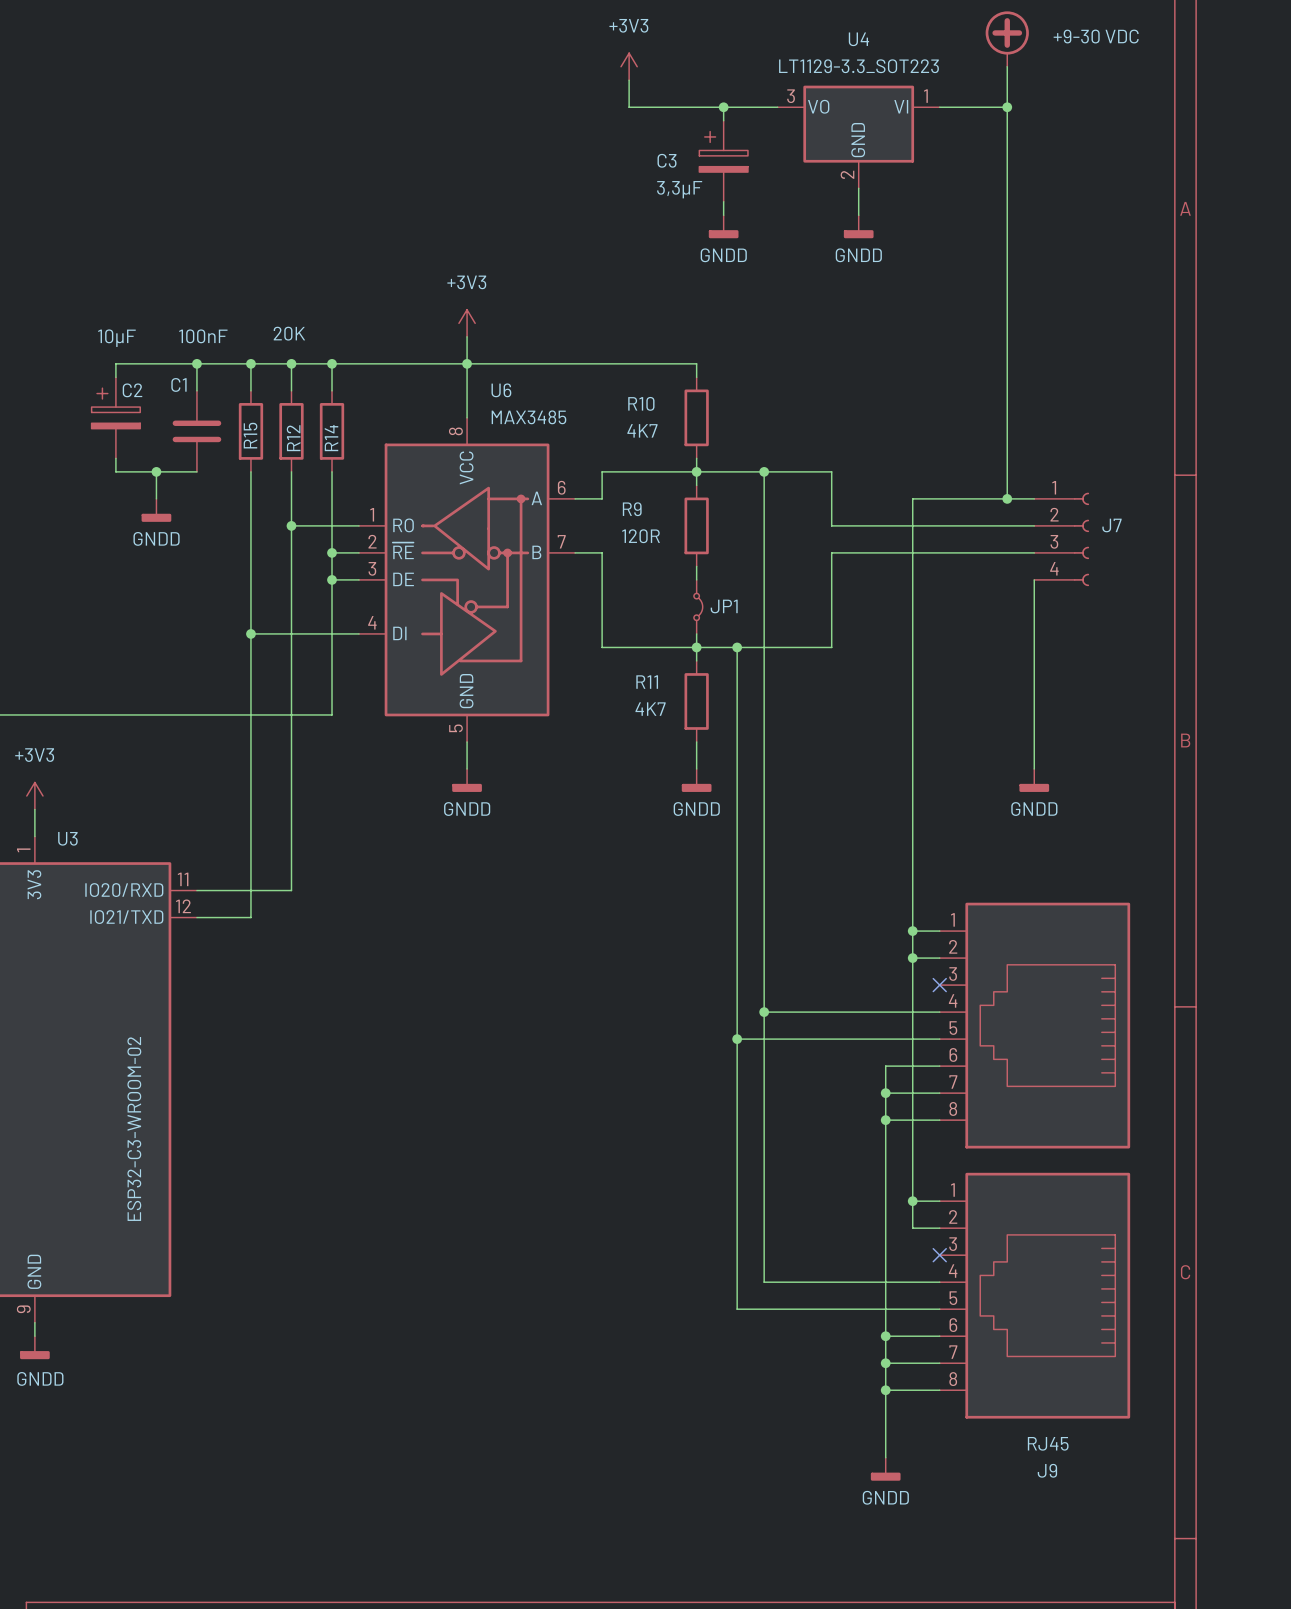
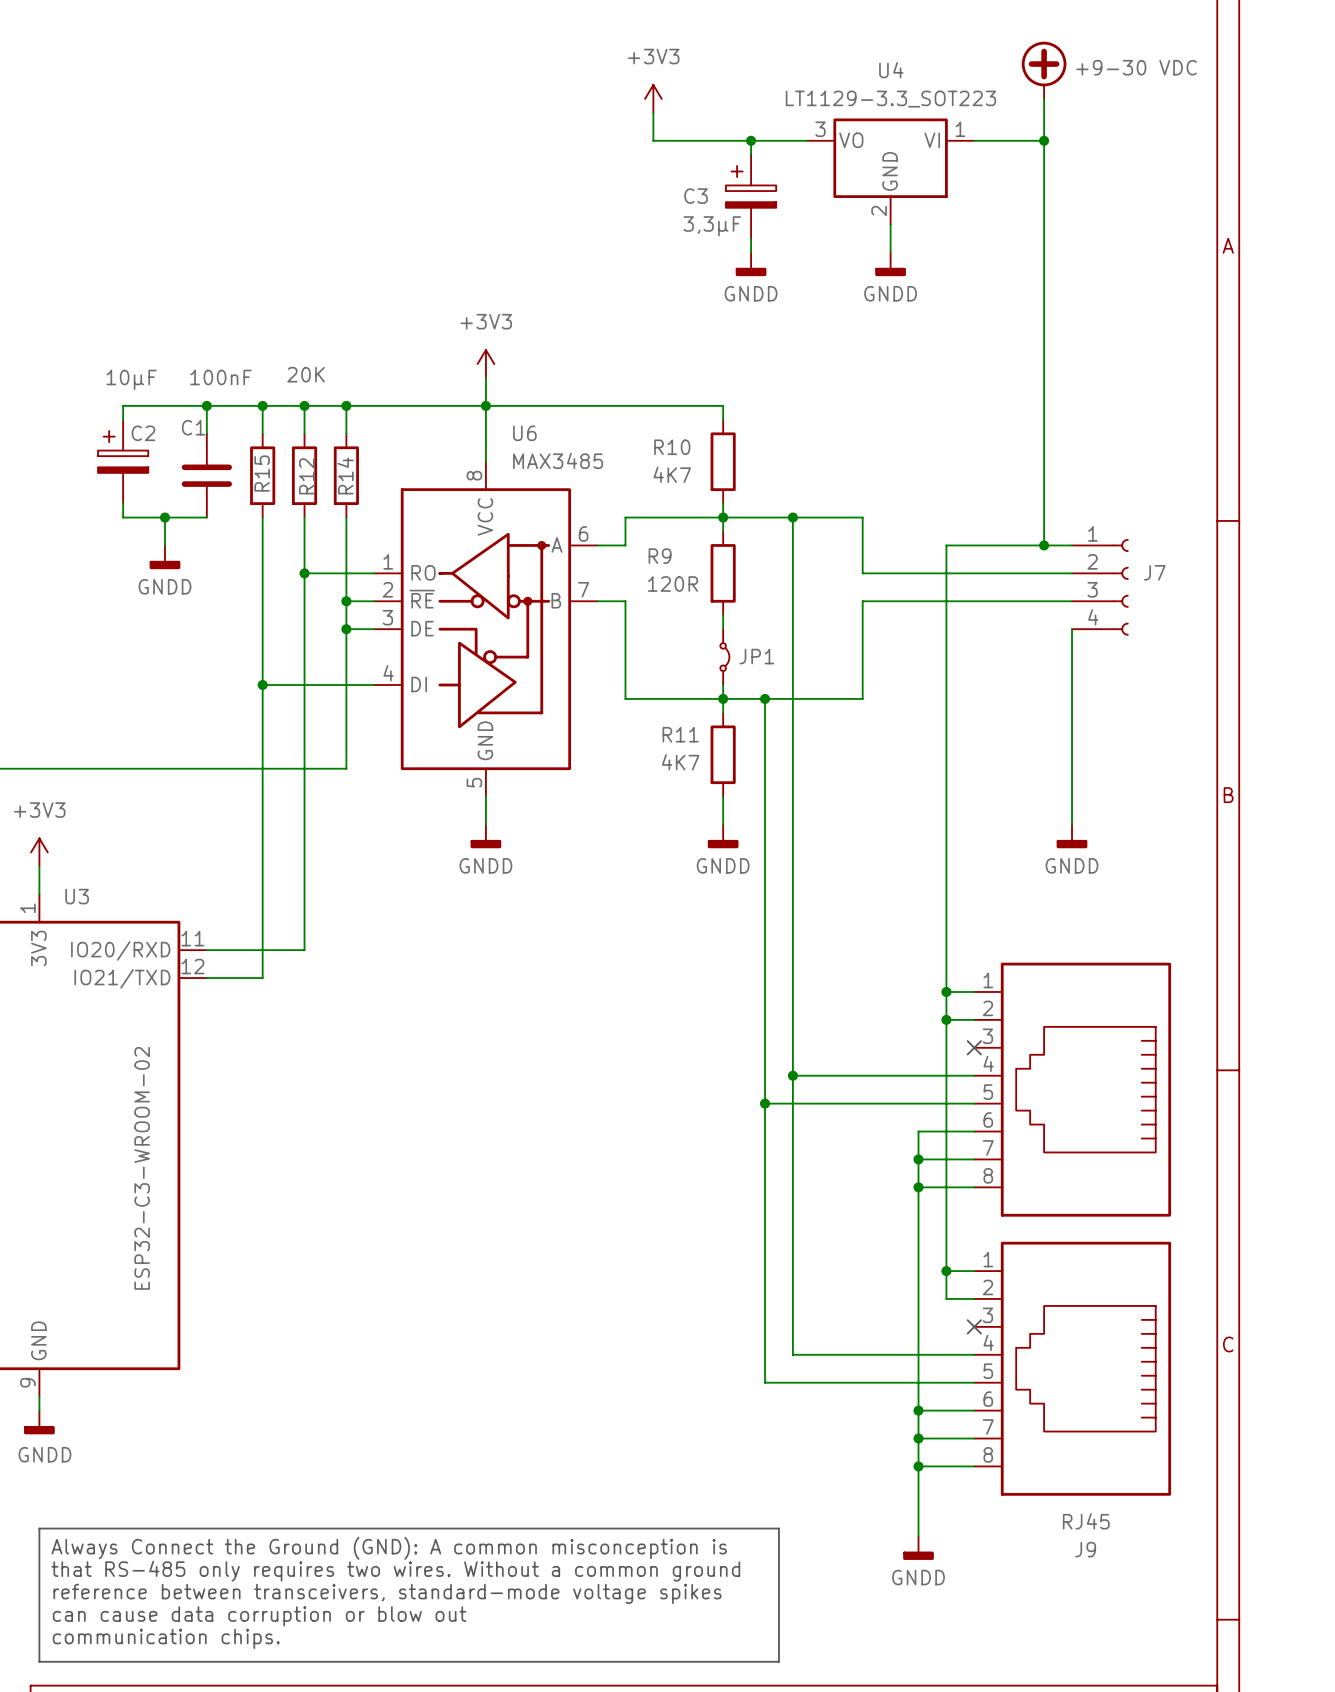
line: none -> (39, 1528) (778, 1528) (778, 1661) (39, 1661) (39, 1528)
text: none -> Always Connect the Ground (GND): A common misconception is (389, 1548)
text: none -> that RS-485 only requires two wires. Without a common ground (395, 1571)
text: none -> reference between transceivers, standard-mode voltage spikes (387, 1593)
text: none -> can cause data corruption or blow out (259, 1616)
text: none -> communication chips. (166, 1638)

